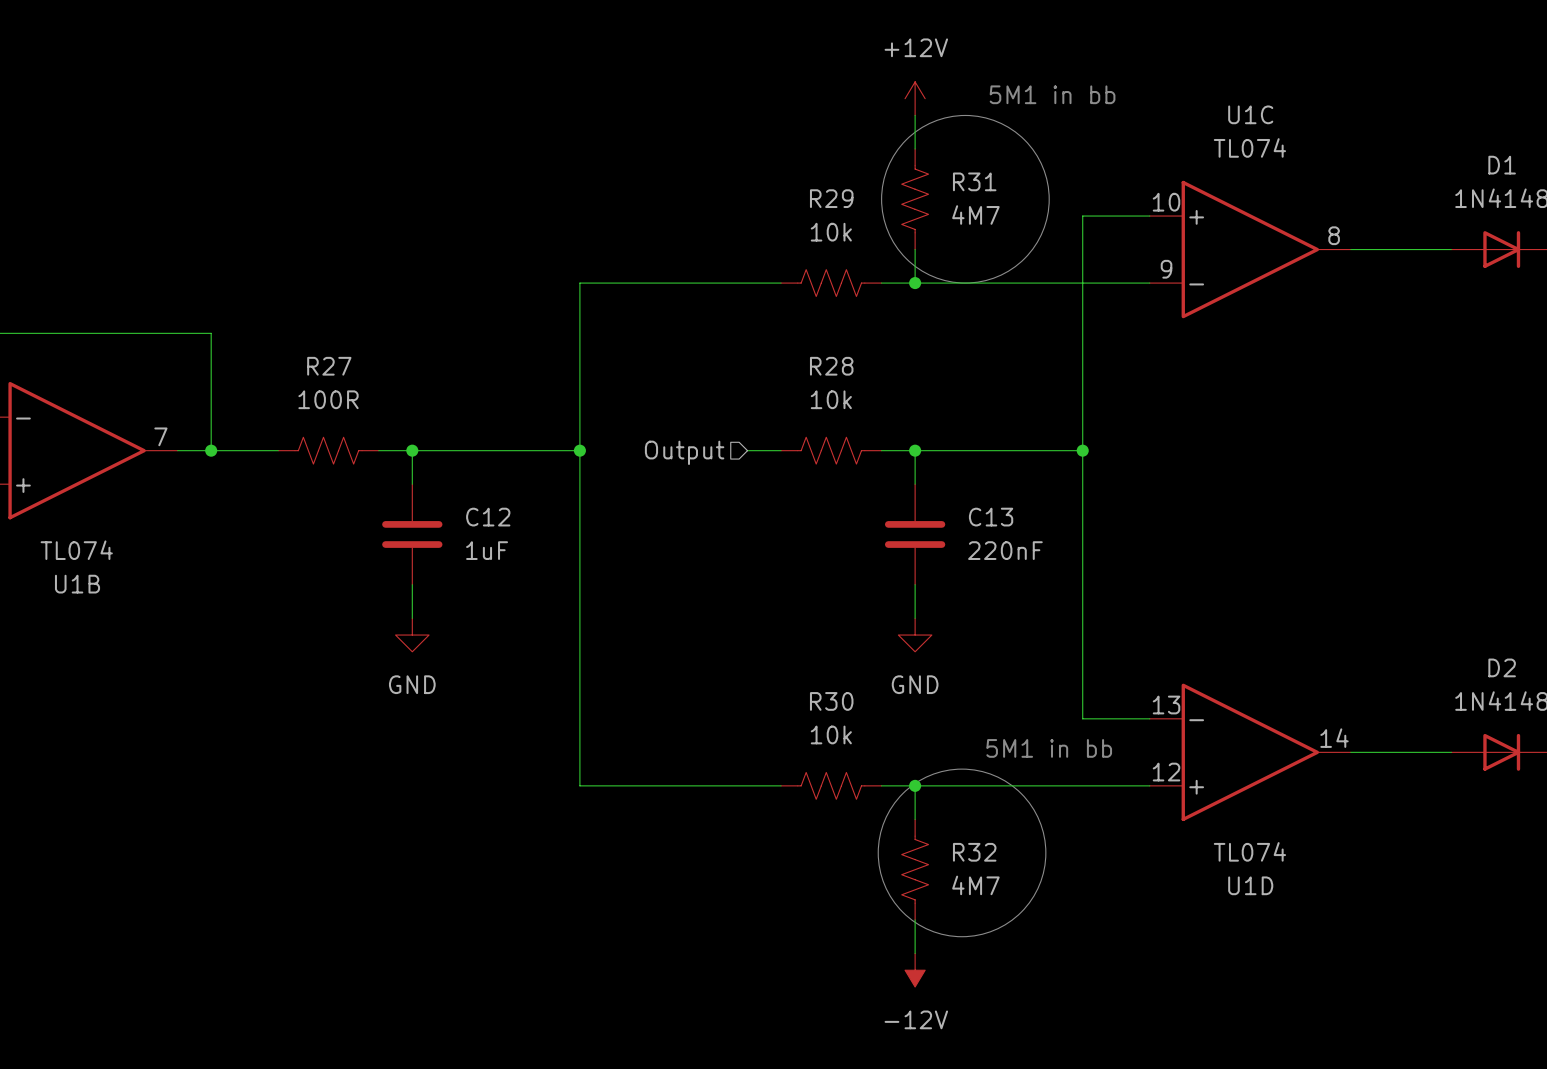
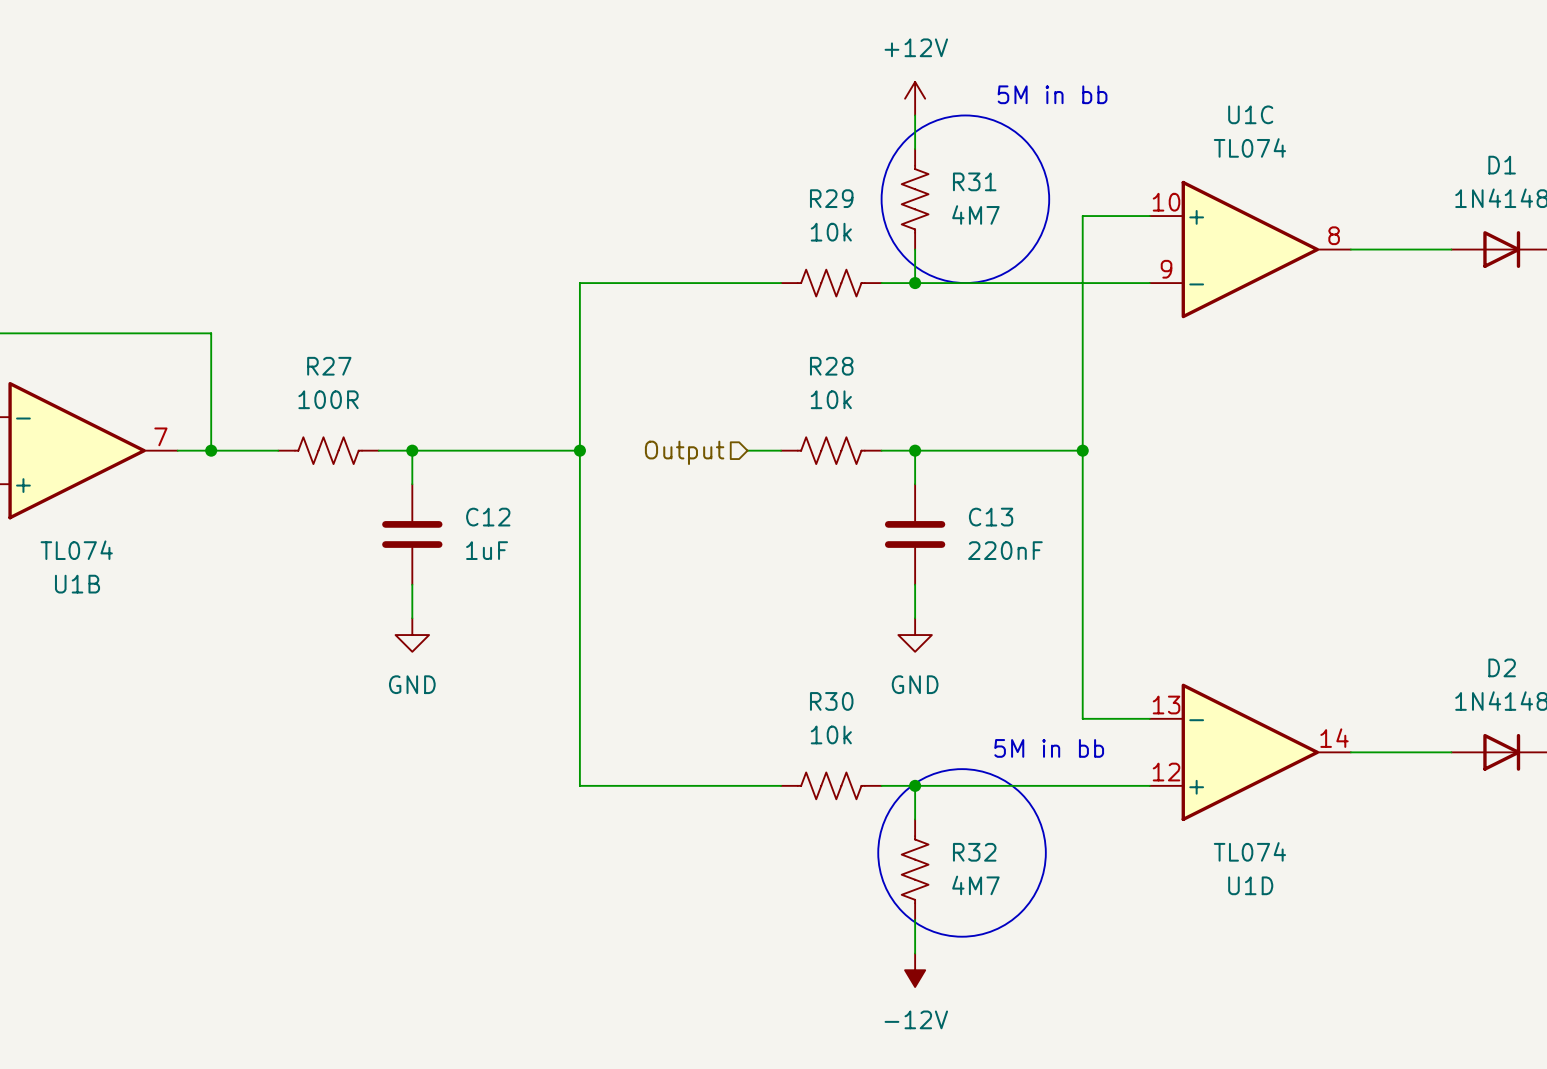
text: 5M1 in bb (1052, 94) -> 5M in bb (1052, 94)
text: 5M1 in bb (1049, 748) -> 5M in bb (1049, 748)

